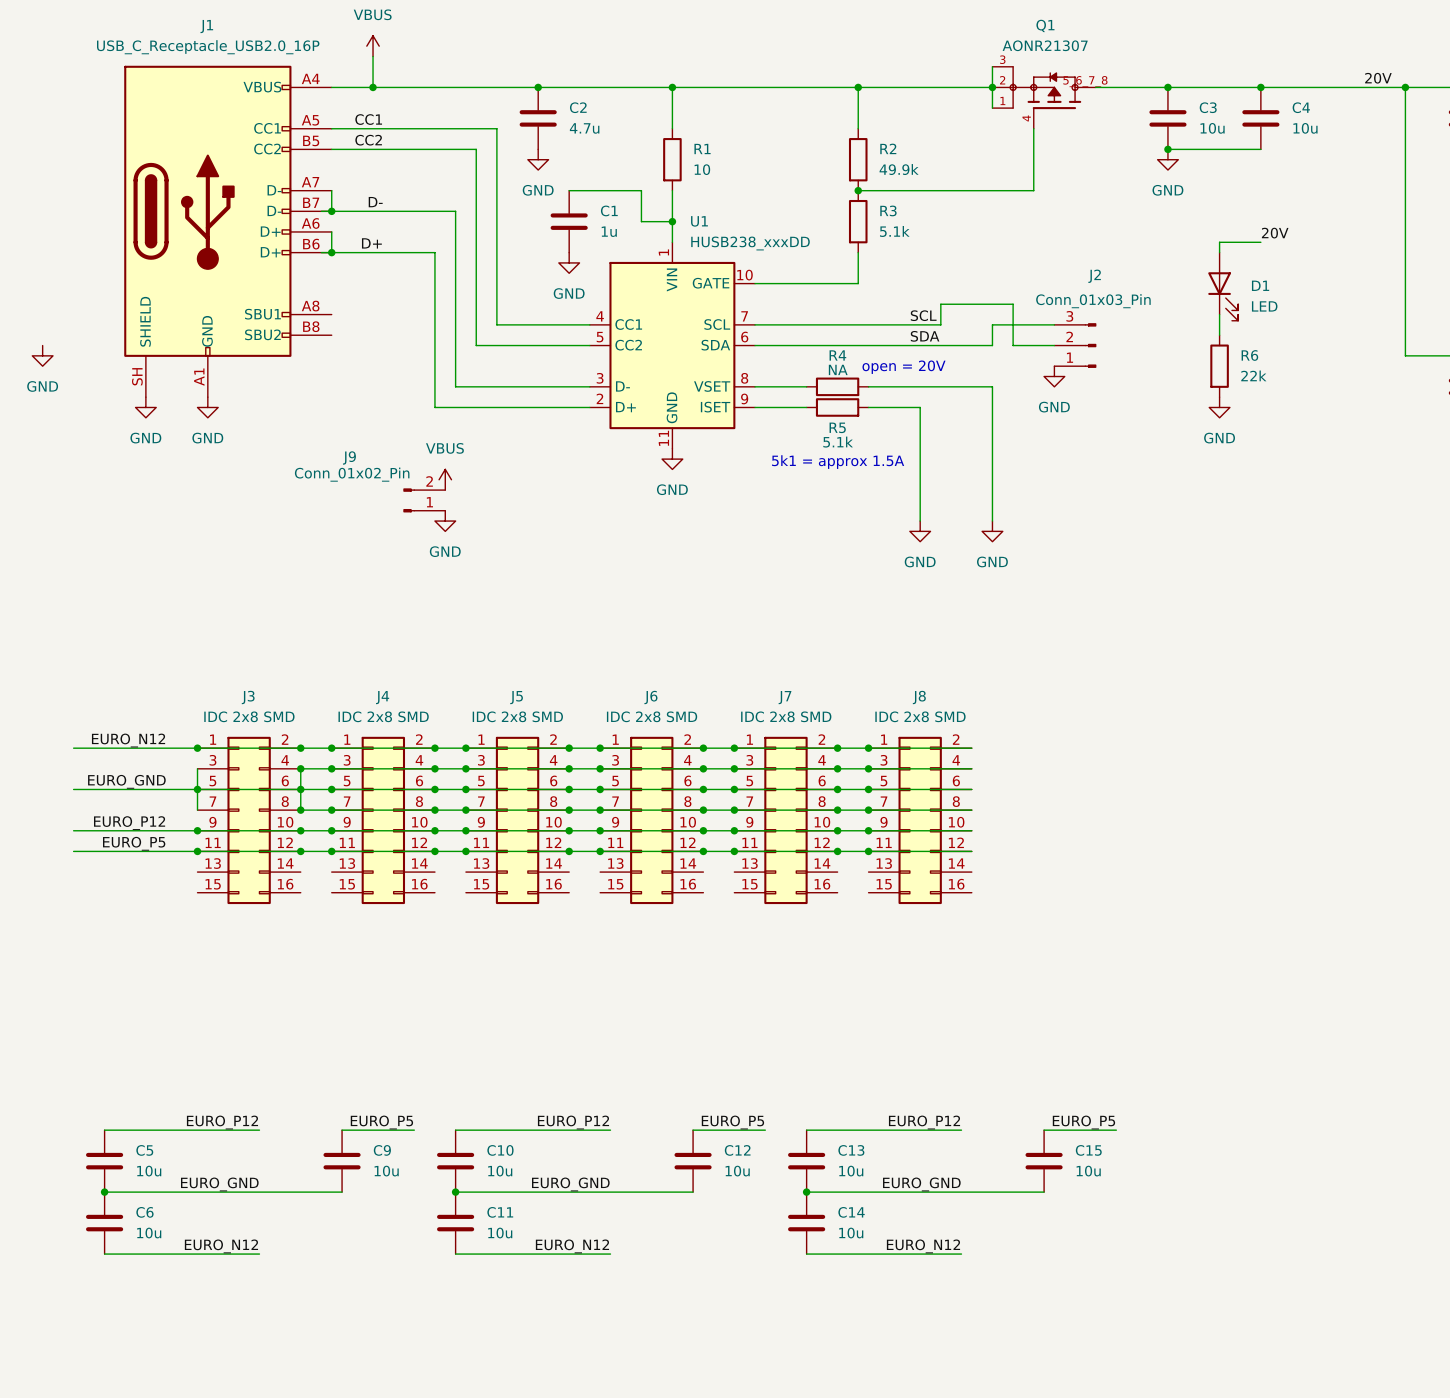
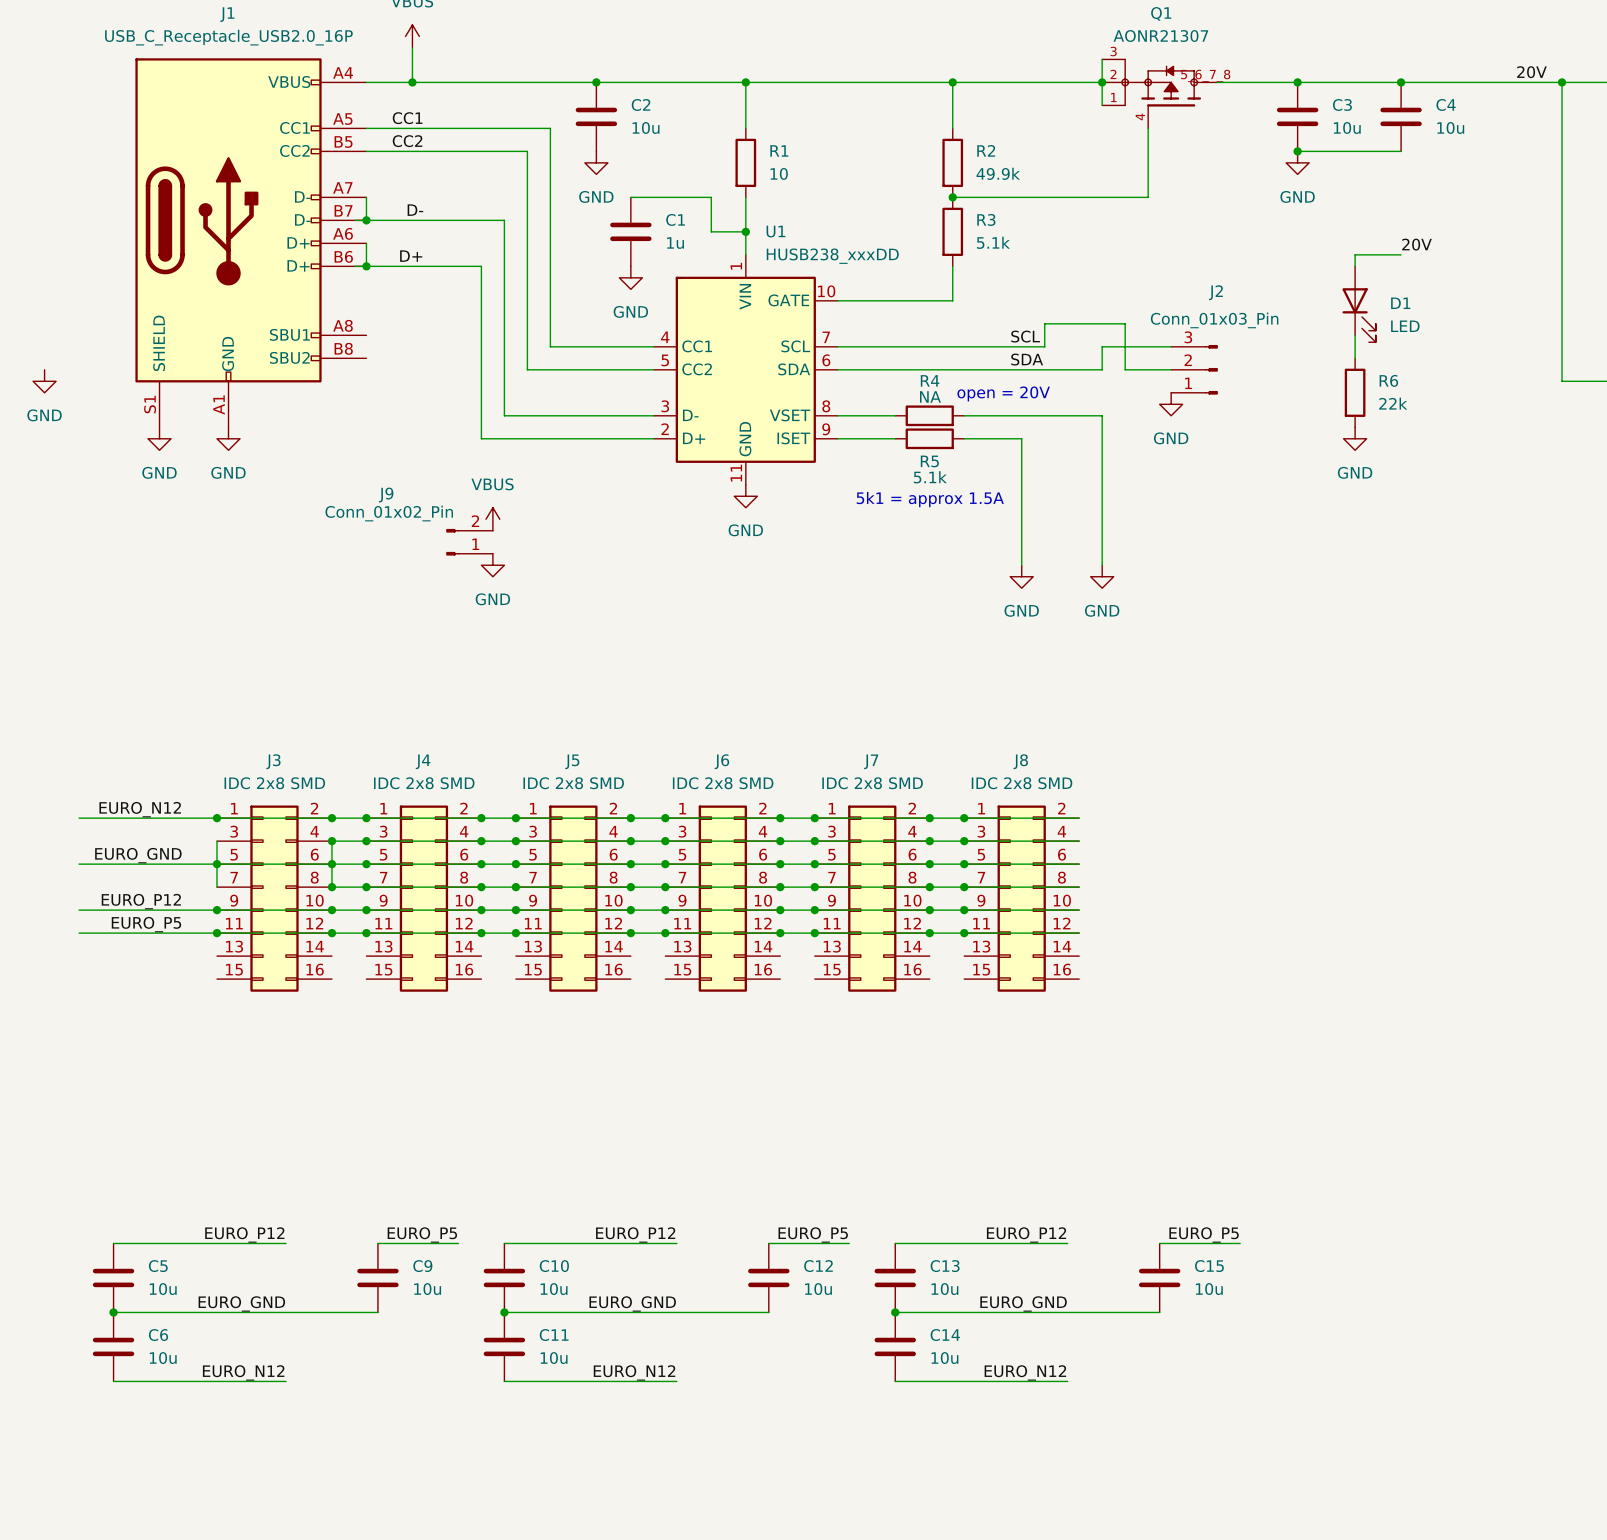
C2 value: 4.7u (584, 128) -> 10u (646, 127)
J1 pin number: SH (137, 376) -> S1 (150, 404)

